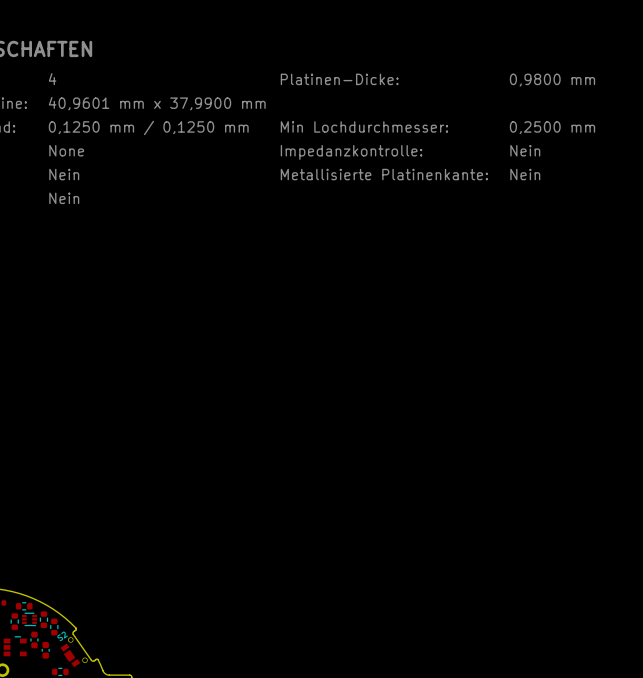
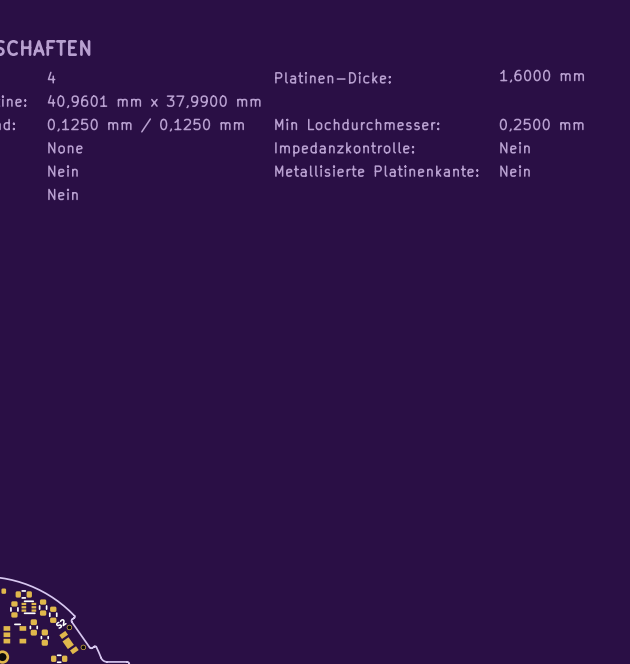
text: 0,9800 mm (552, 80) -> 1,6000 mm (542, 76)

